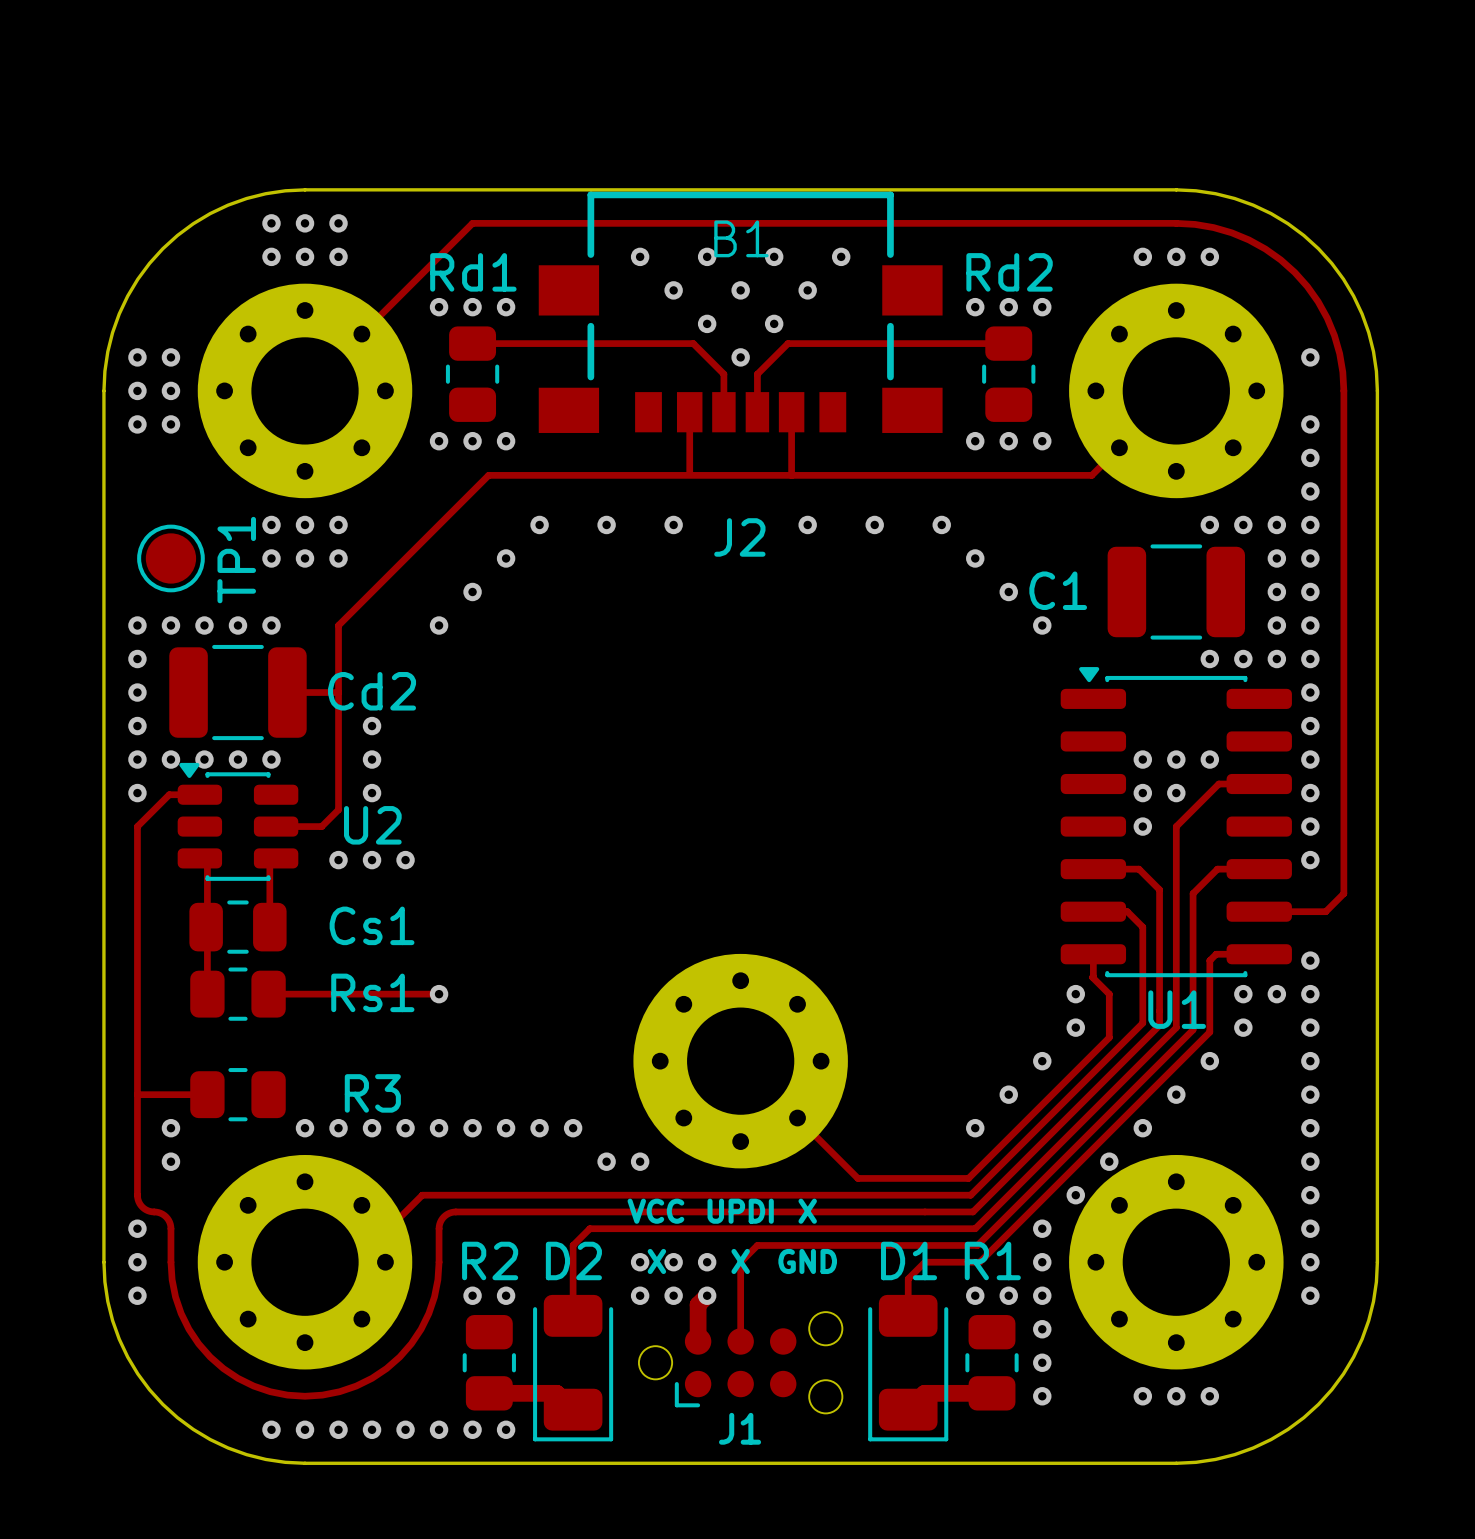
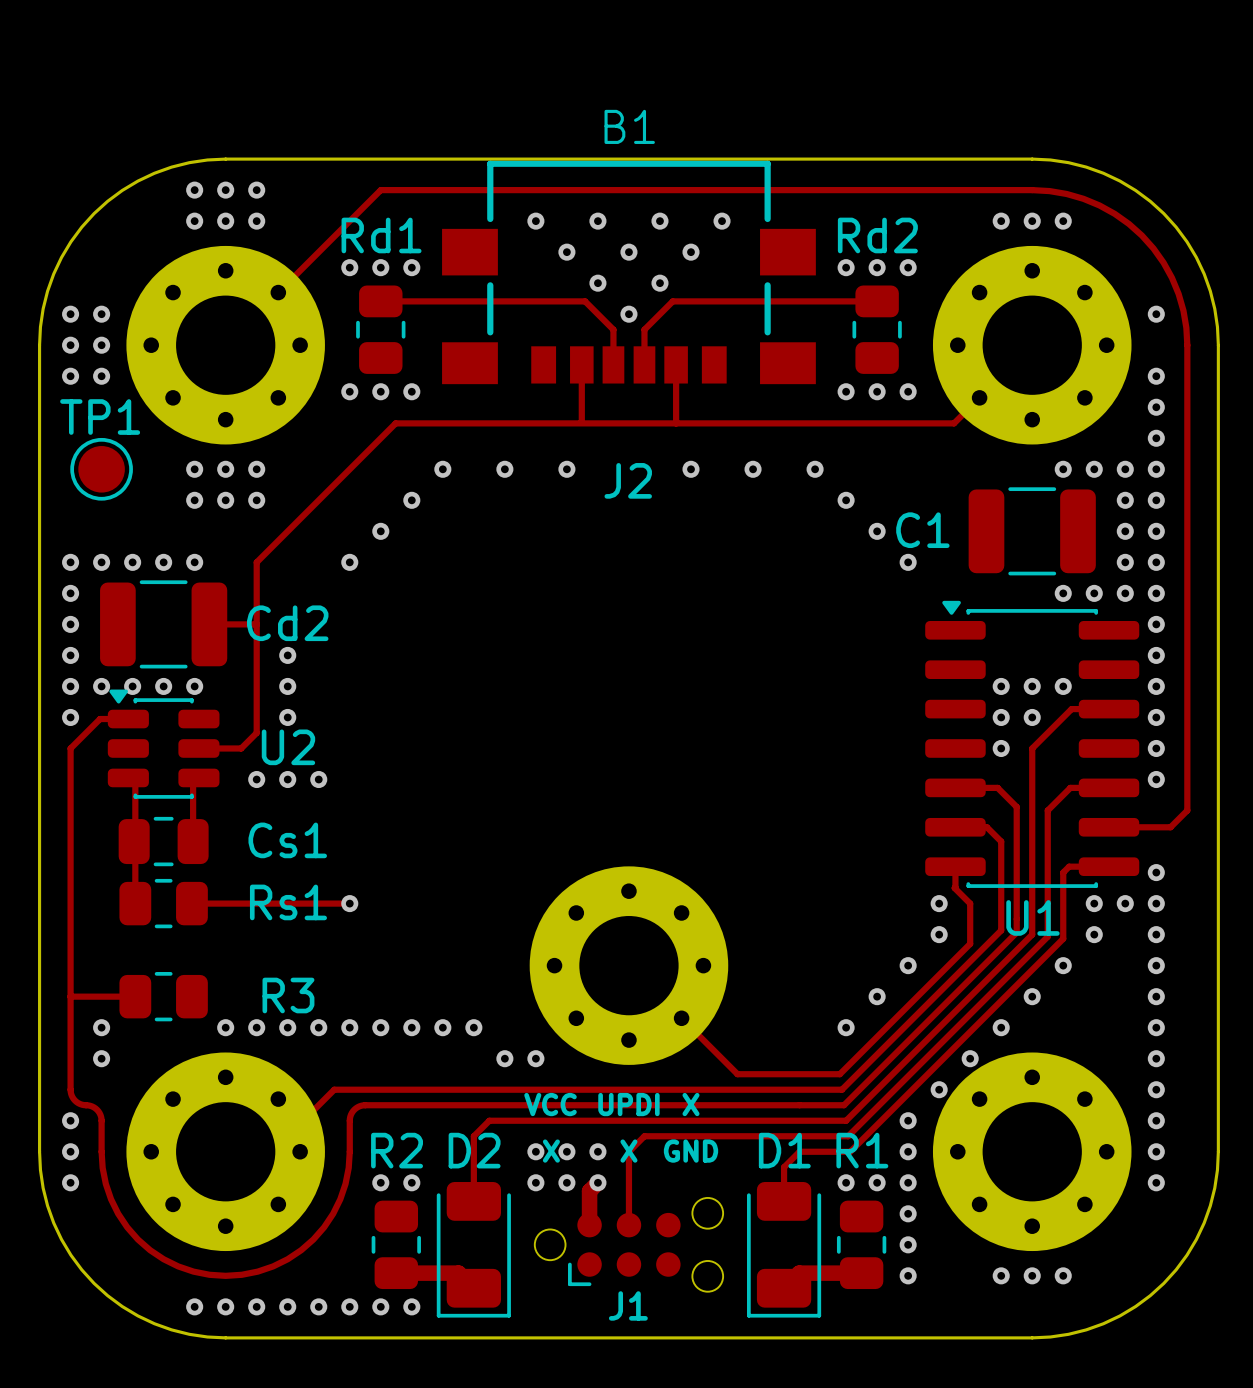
B1 name position: B1 (741, 238) -> B1 (629, 126)
TP1 position: (170, 558) -> (101, 469)
TP1 name rotation: 0° (236, 560) -> 90° clockwise (100, 417)

